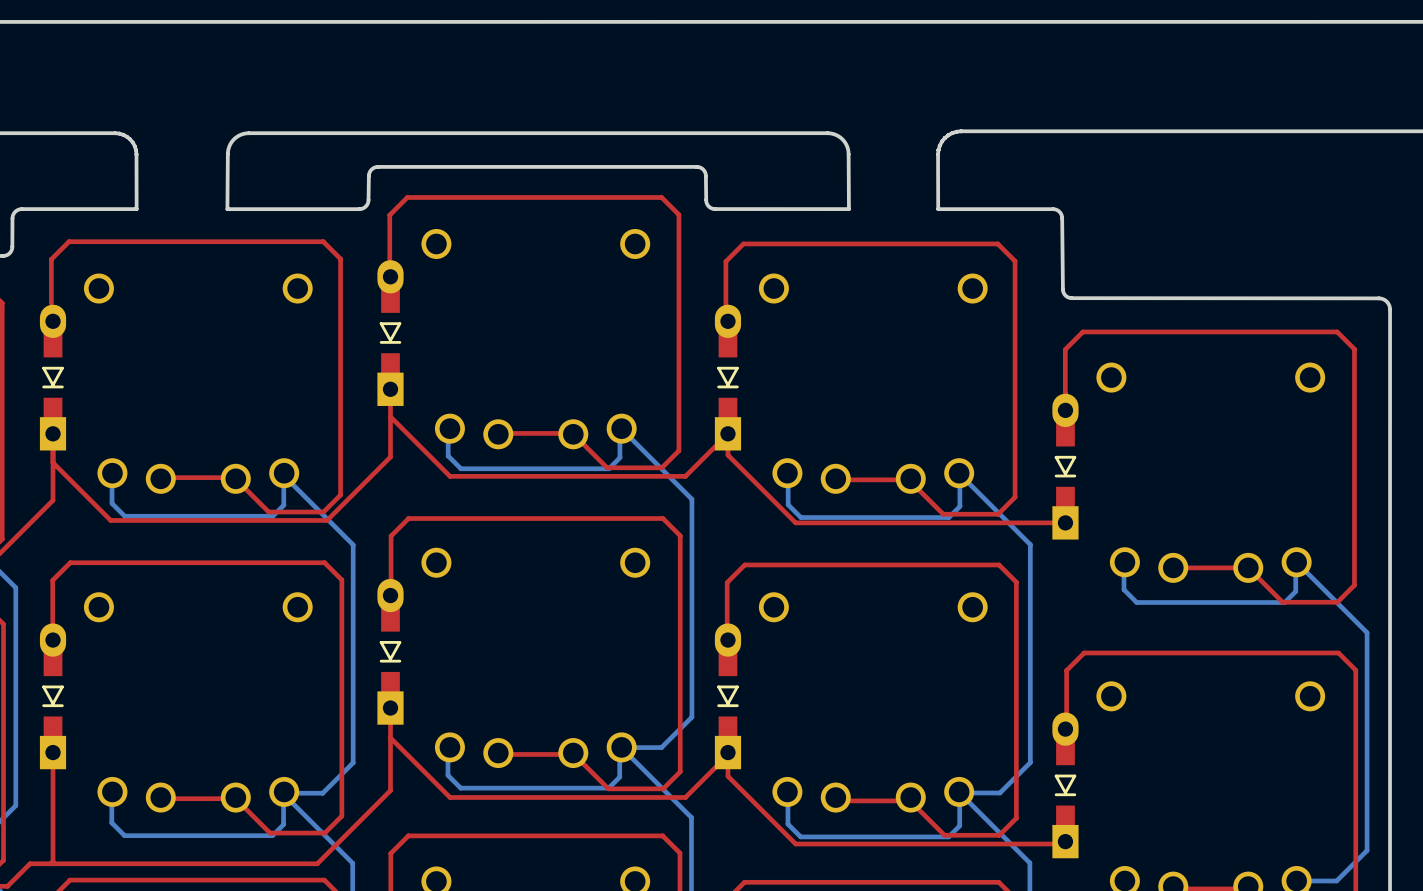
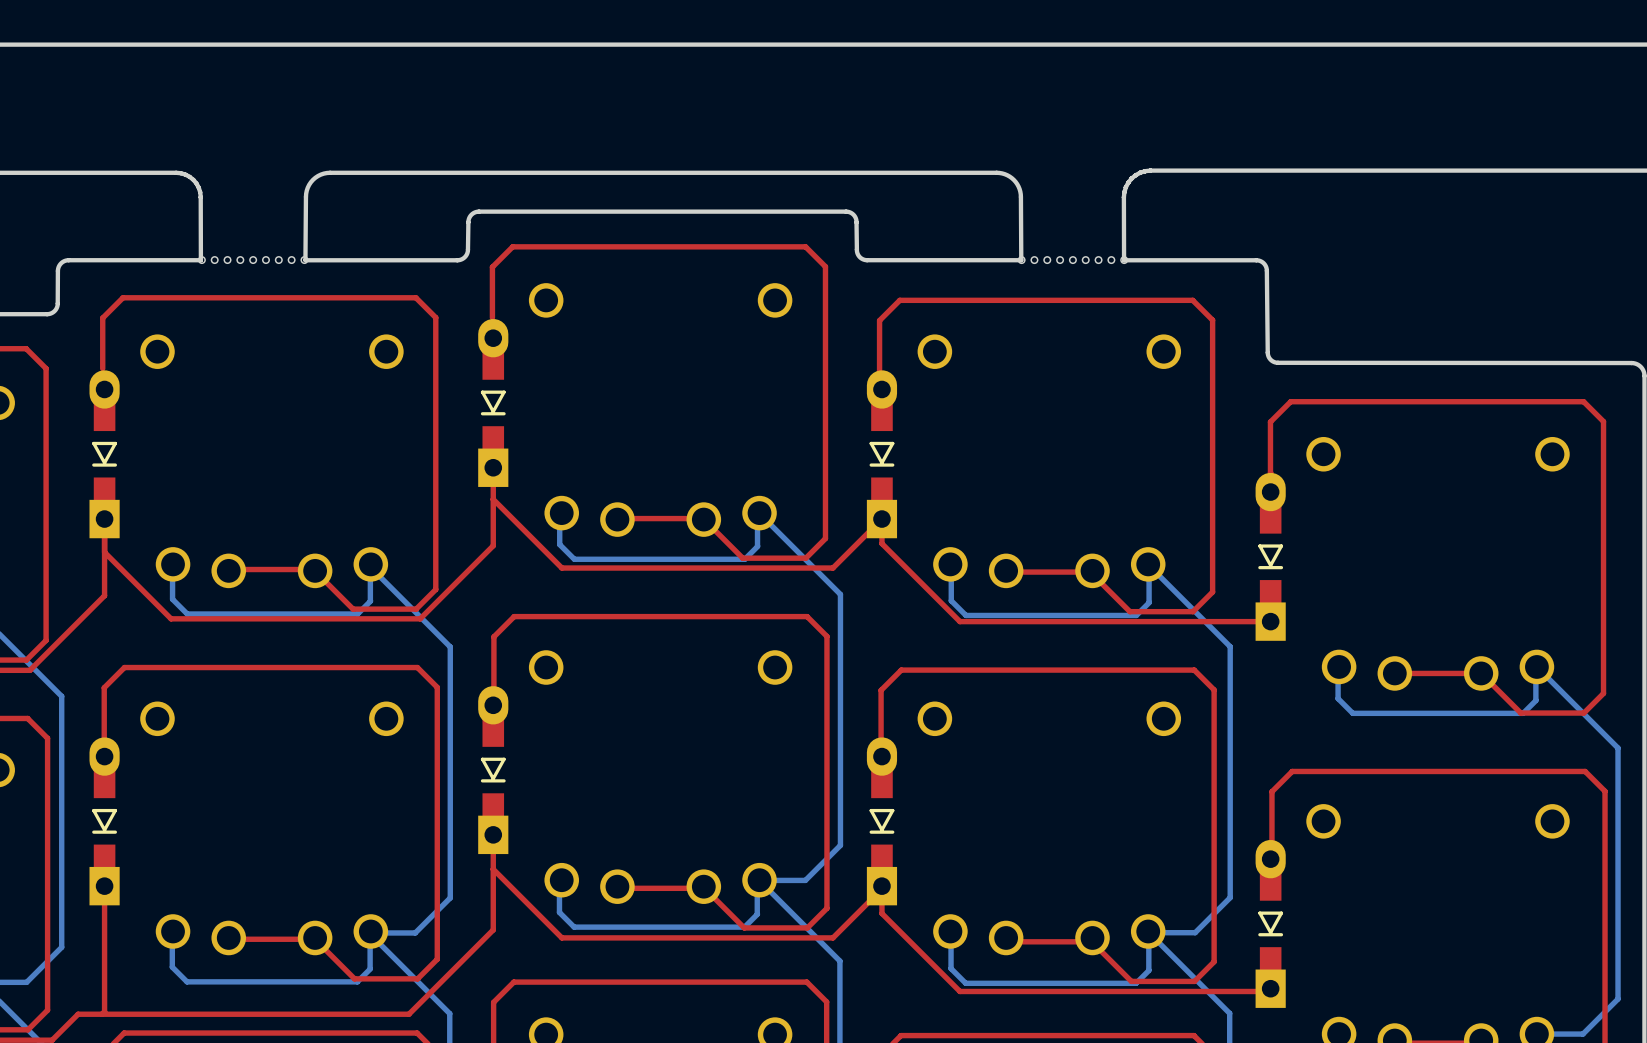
part: none -> (253, 260)
part: none -> (1072, 260)

